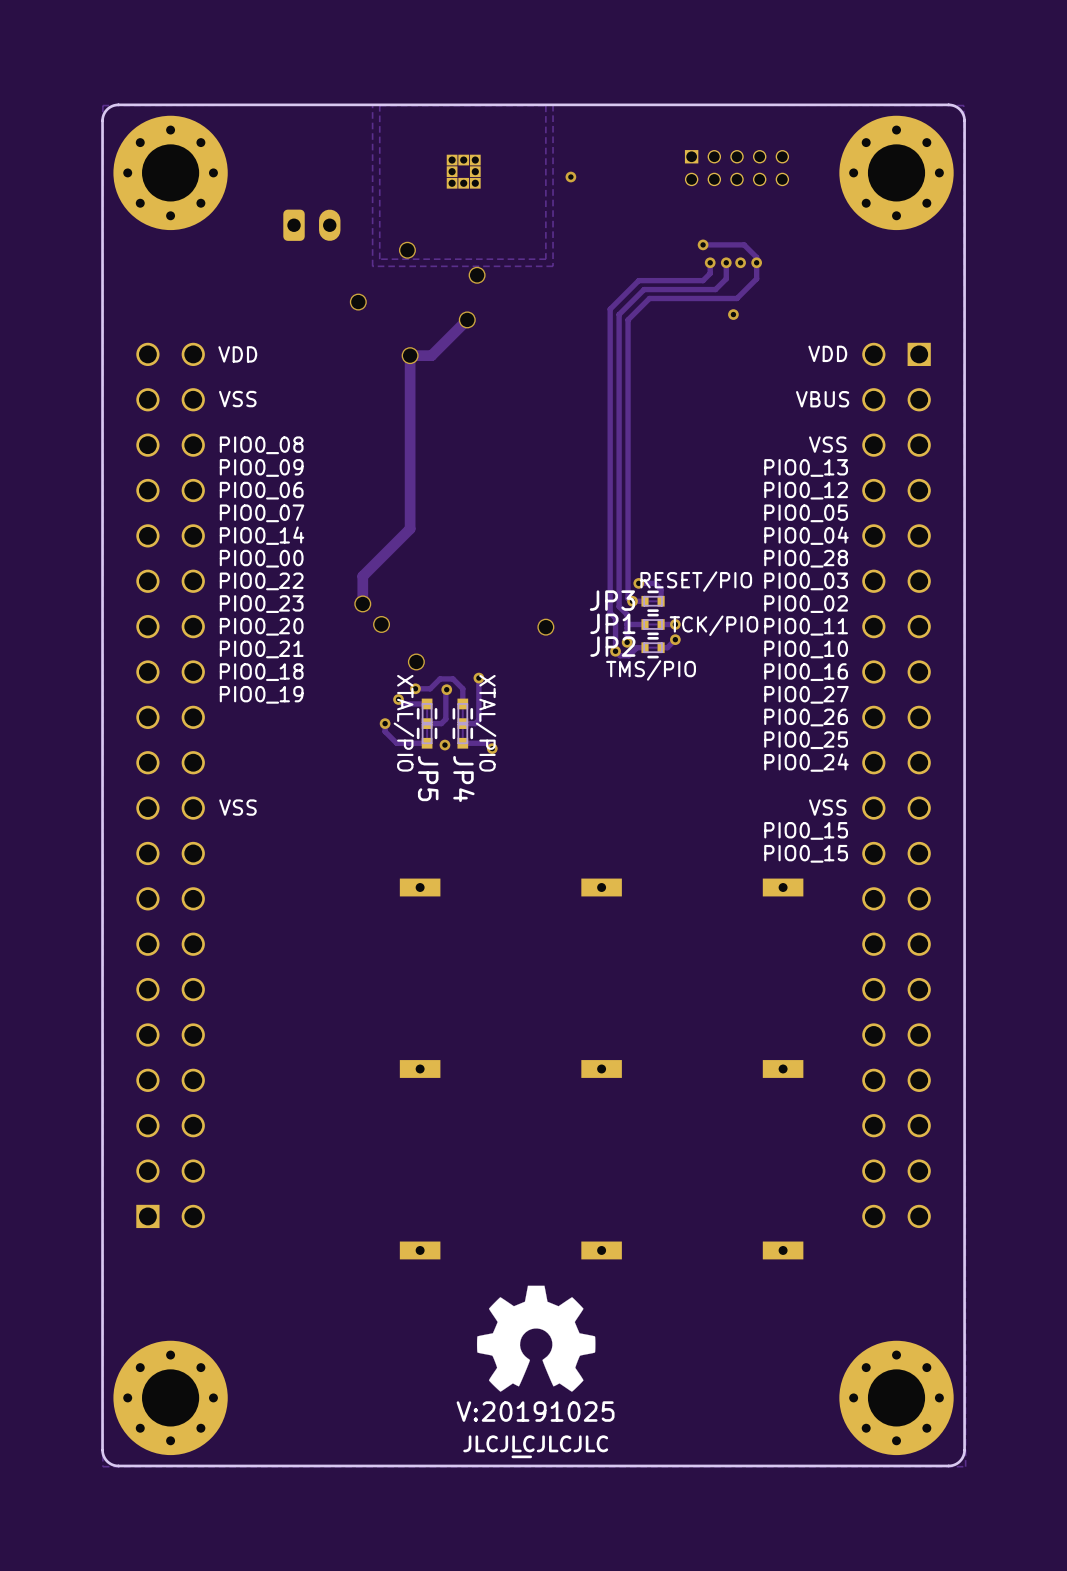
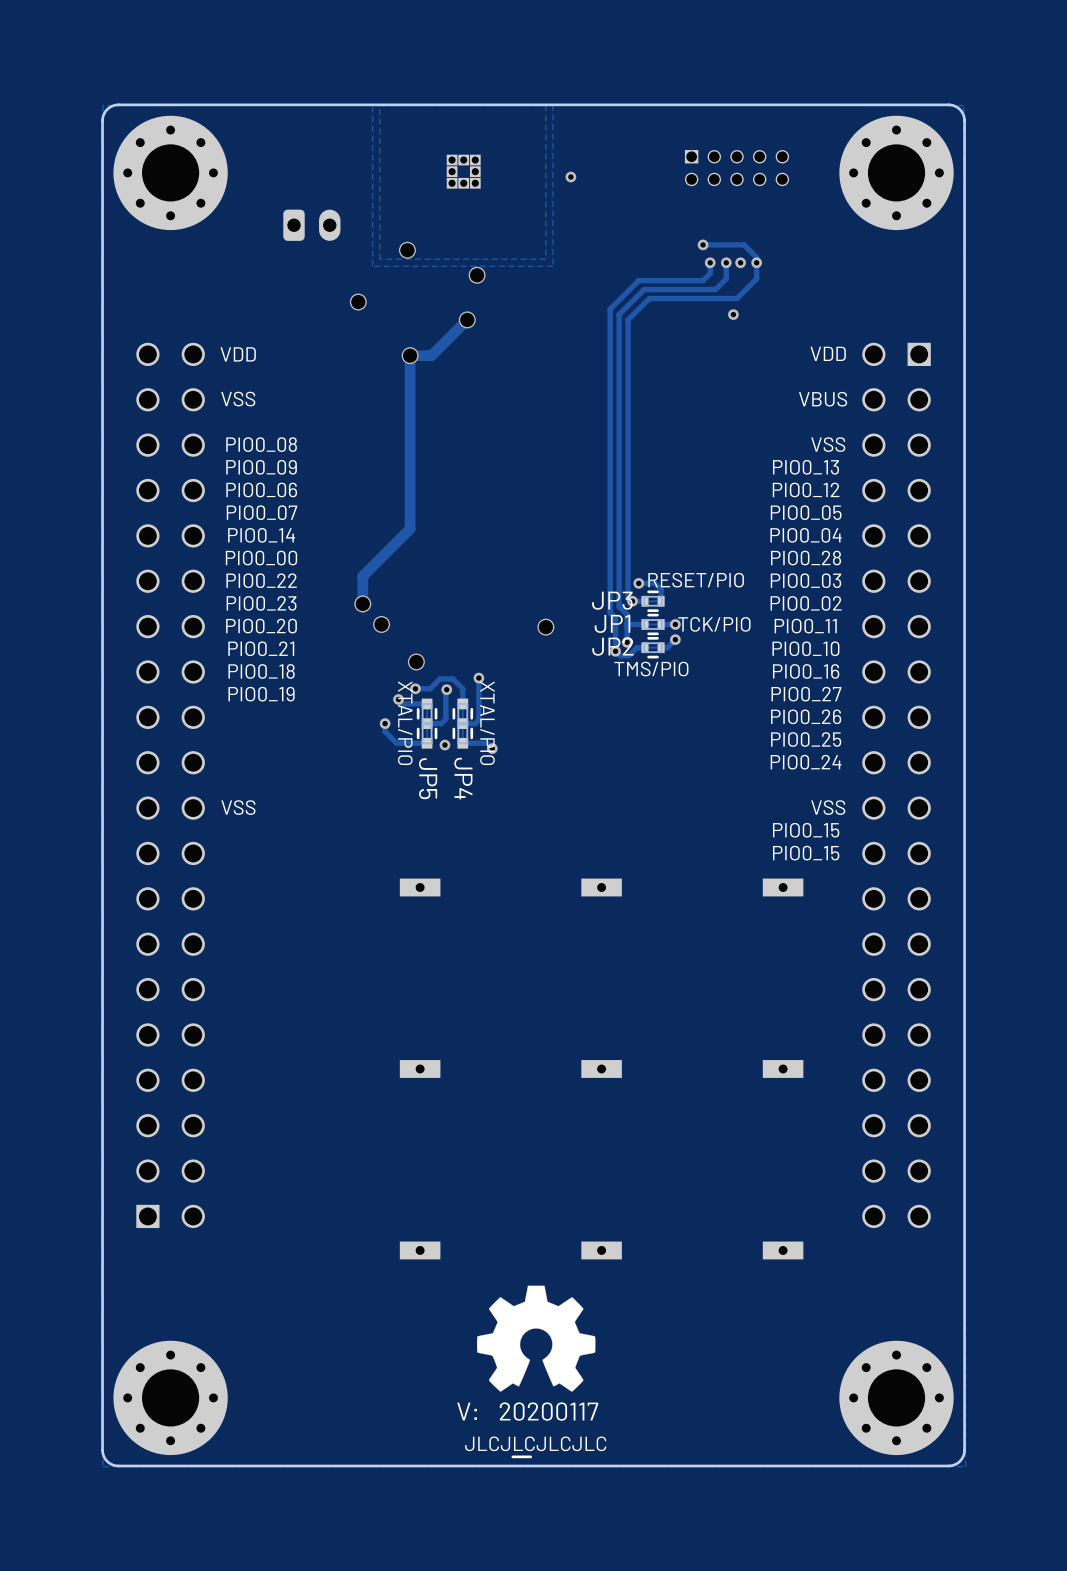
drawing shape: [456, 1401, 615, 1422] -> [457, 1402, 599, 1421]

